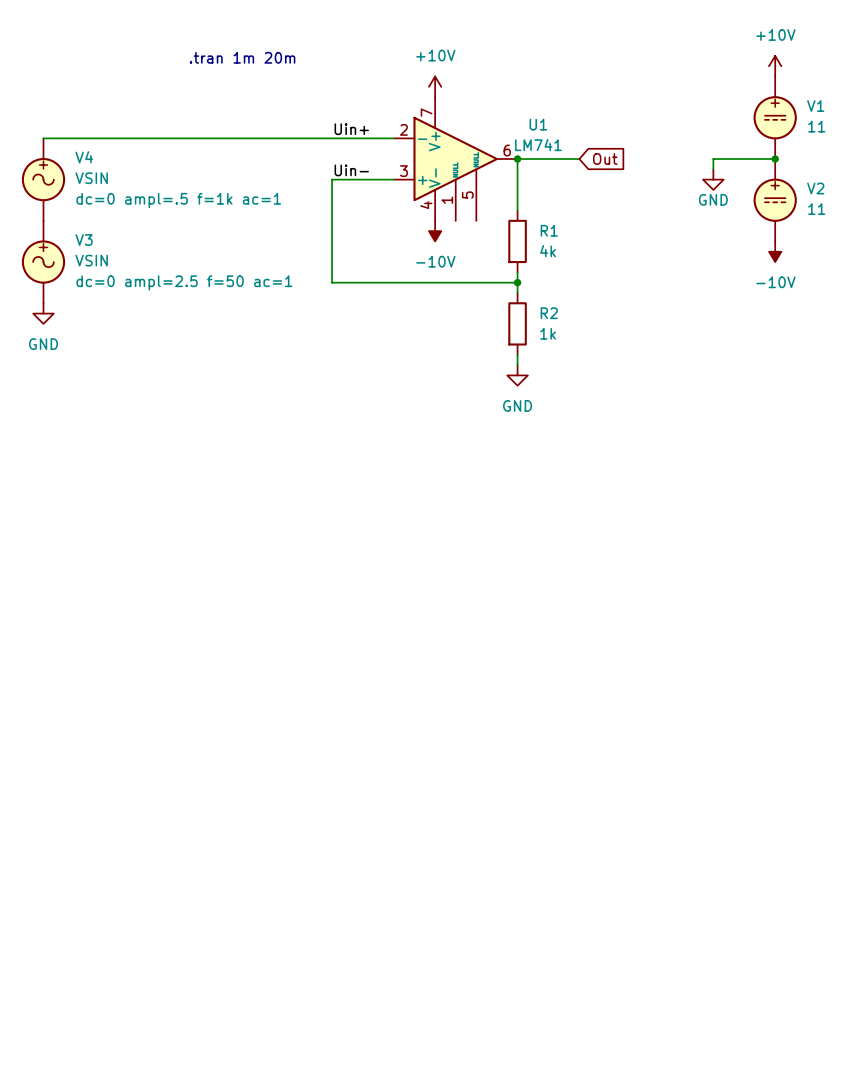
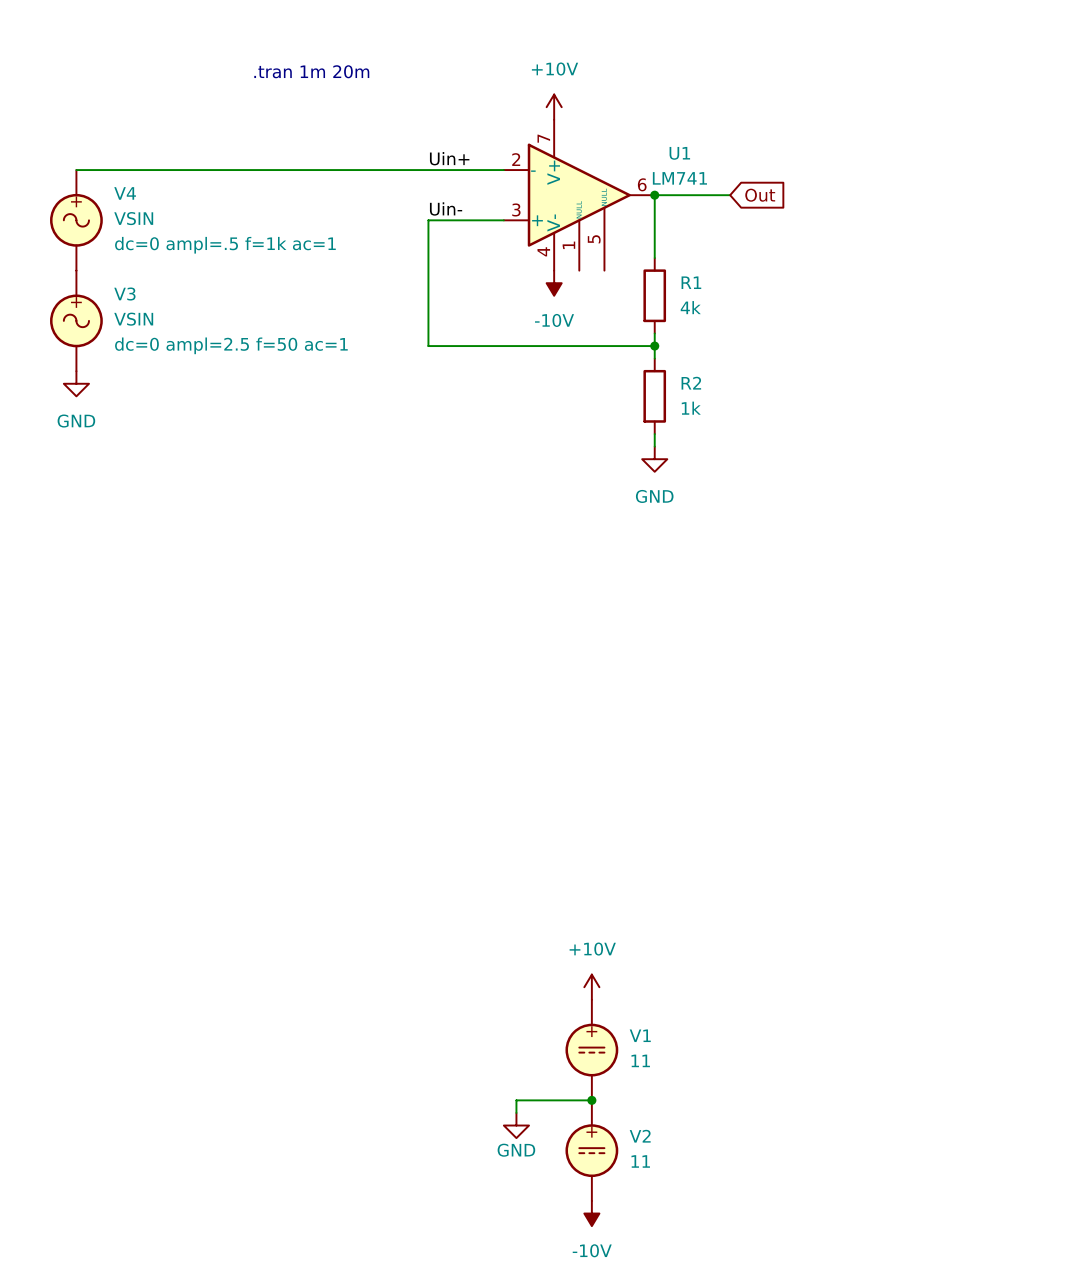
power symbol: +10V (775, 66) -> none
V1 position: (775, 117) -> (591, 1050)
wire: (775, 159) (713, 159) (713, 169) -> none
junction: (775, 159) -> none
power symbol: GND (713, 179) -> none
V2 position: (775, 200) -> (591, 1150)
power symbol: -10V (775, 251) -> none
power symbol: none -> +10V (591, 987)
wire: none -> (591, 1100) (516, 1100) (516, 1112)
junction: none -> (591, 1100)
power symbol: none -> GND (516, 1125)
power symbol: none -> -10V (591, 1213)

